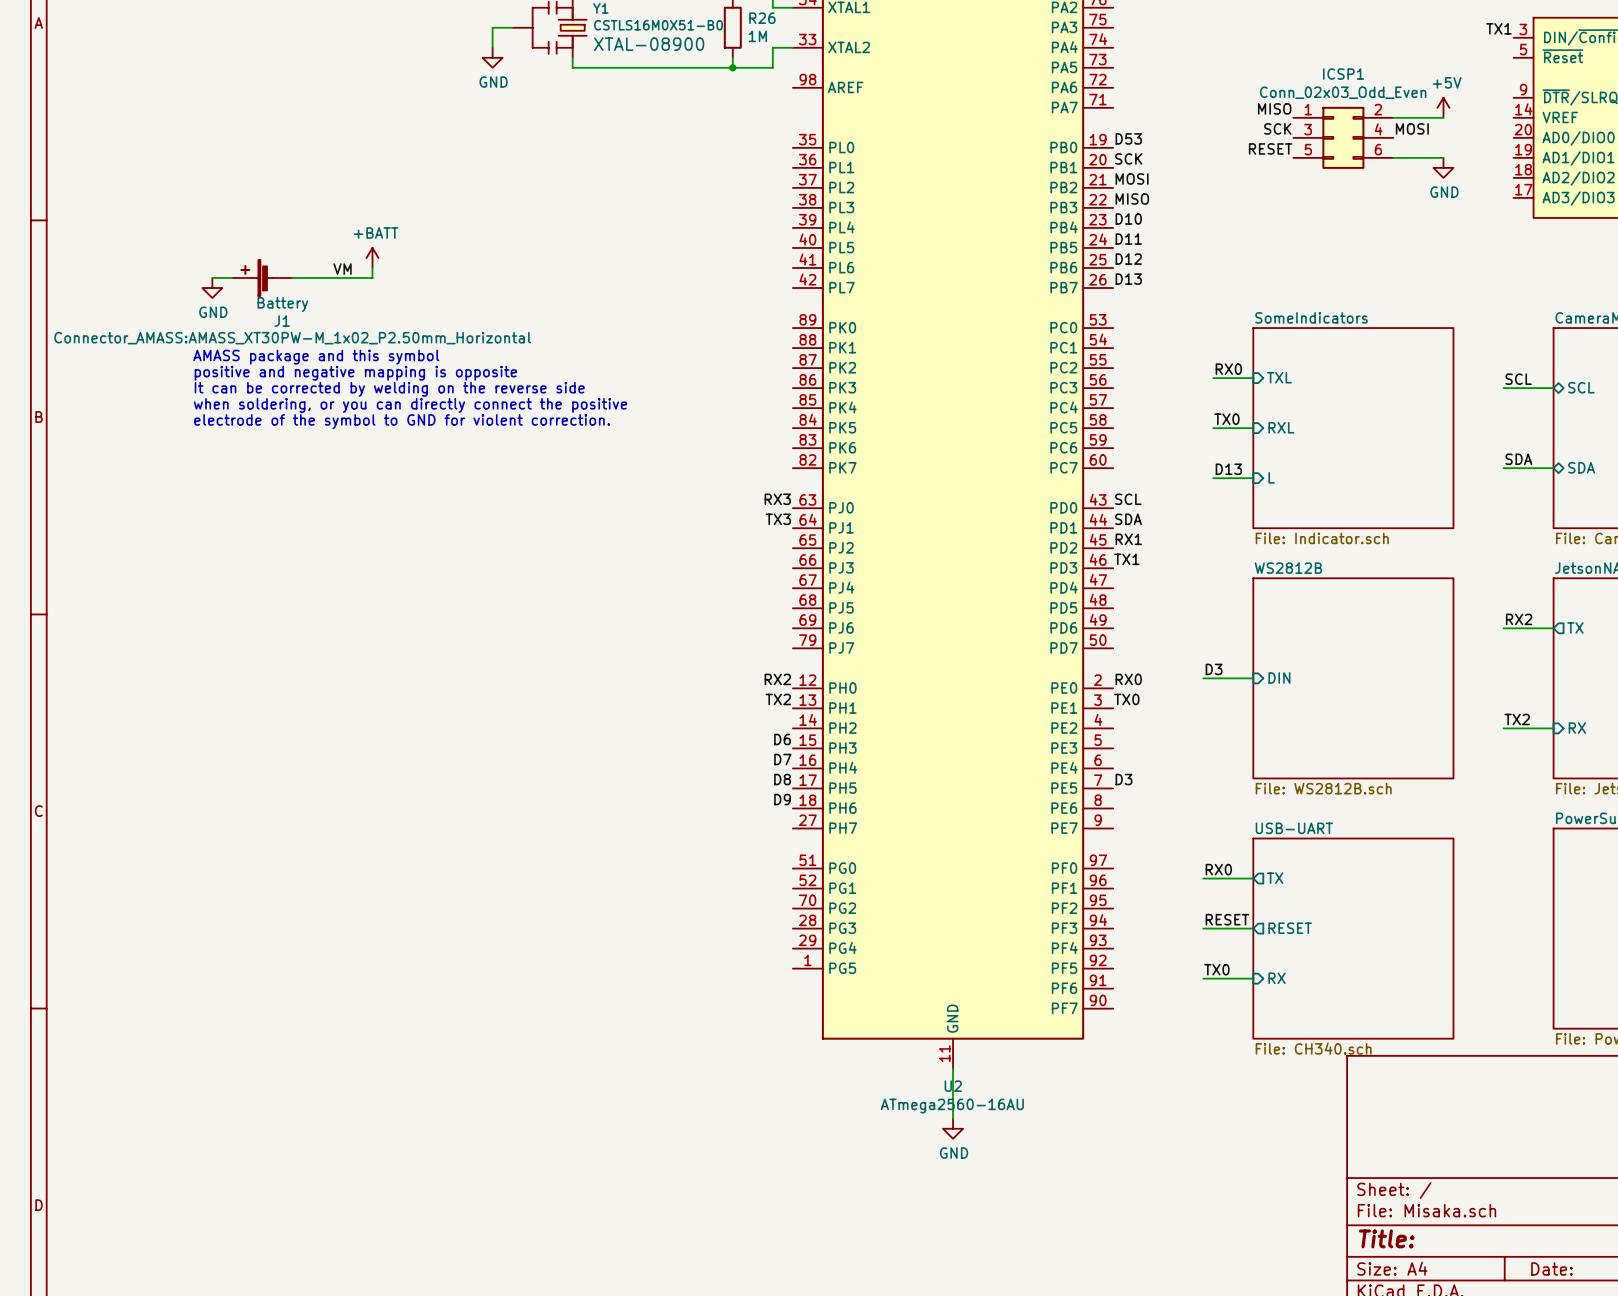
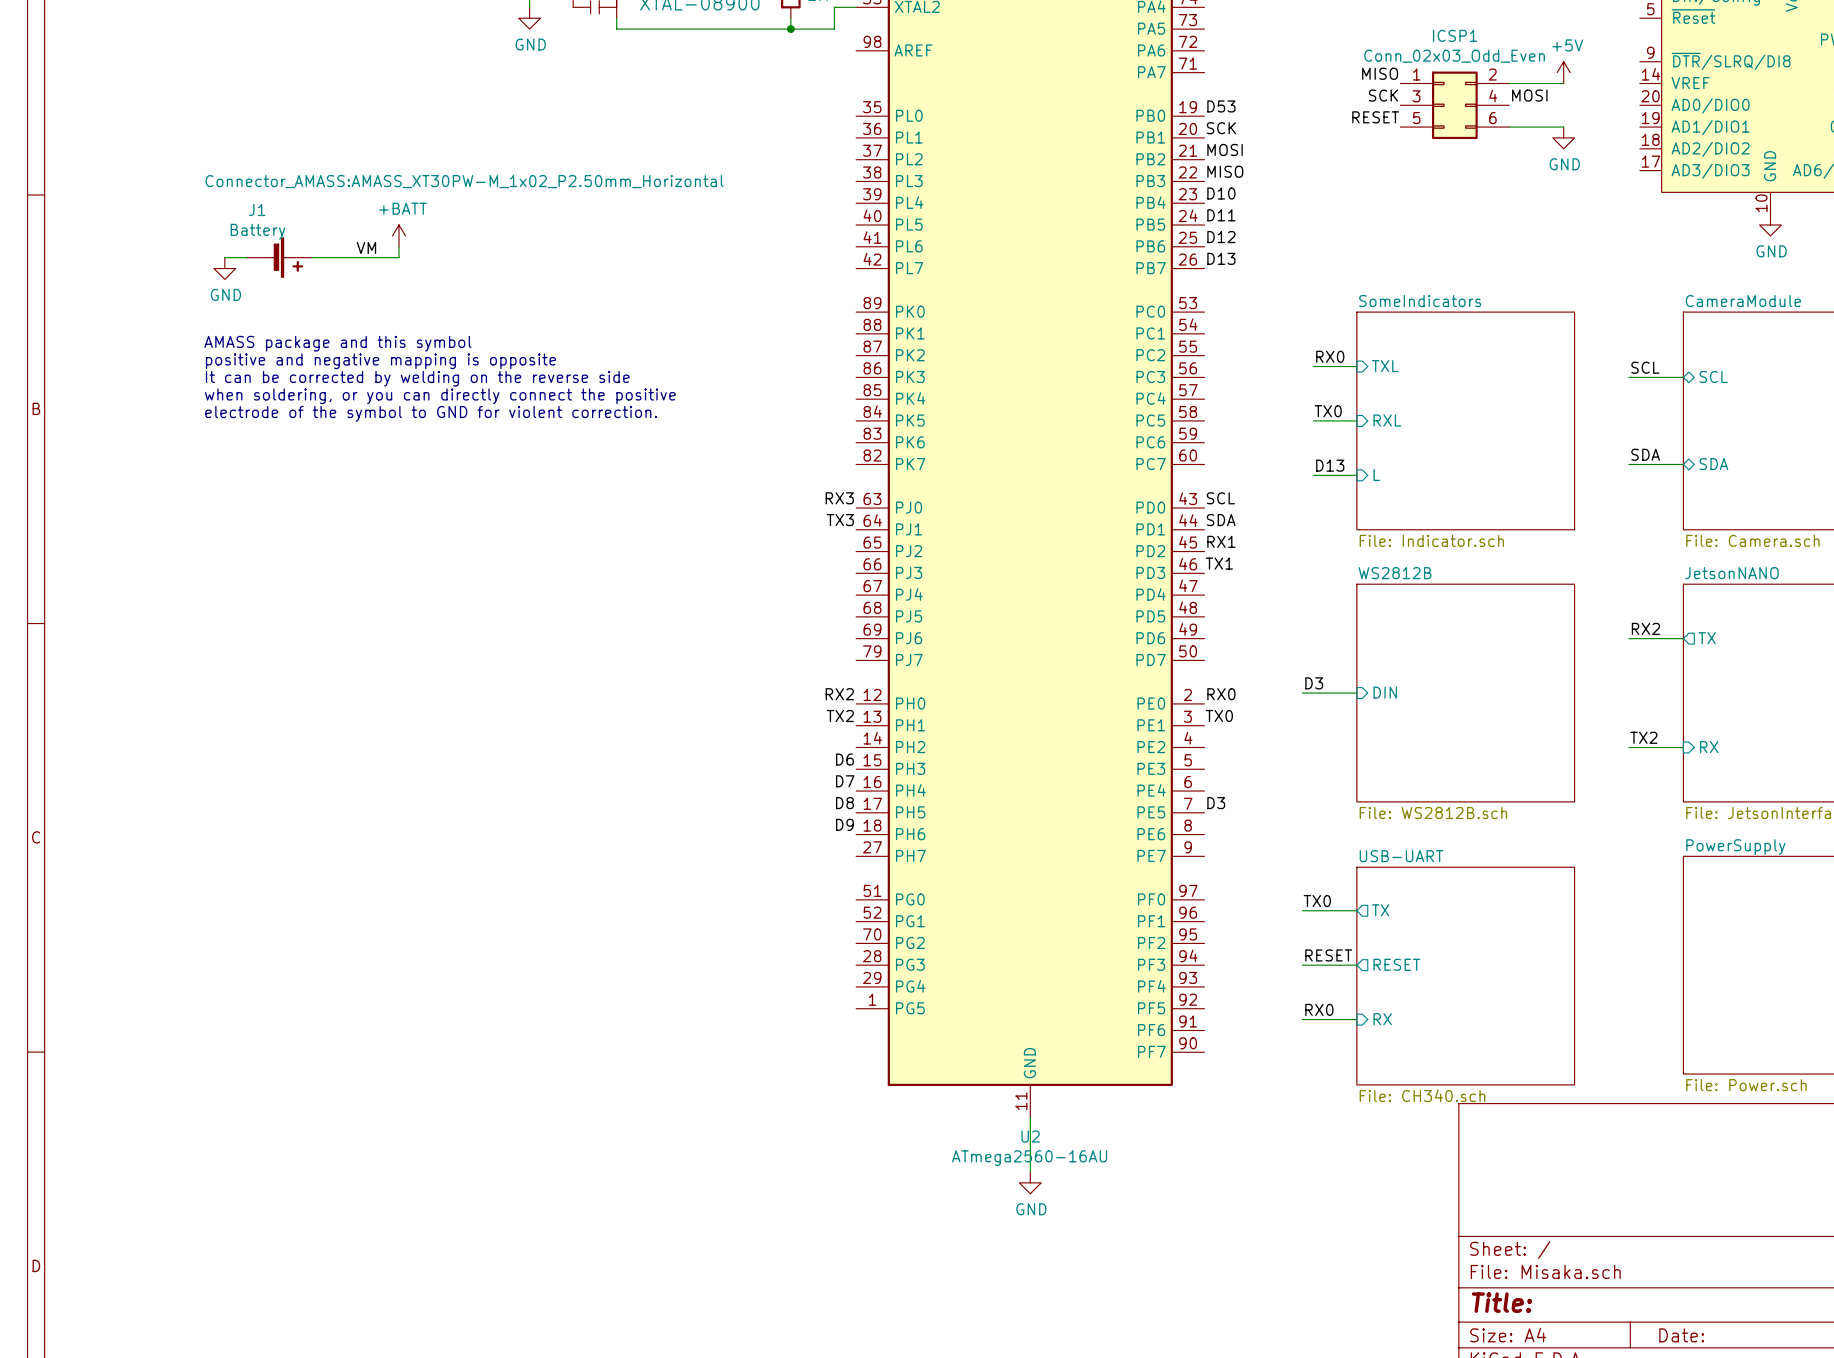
J1 rotation: 0° (256, 278) -> 180° (285, 257)
J1 text position: Connector_AMASS:AMASS_XT30PW-M_1x02_P2.50mm_Horizontal (292, 338) -> Connector_AMASS:AMASS_XT30PW-M_1x02_P2.50mm_Horizontal (464, 181)
label: RX0 (1218, 869) -> TX0 (1317, 901)
label: TX0 (1216, 969) -> RX0 (1319, 1009)

